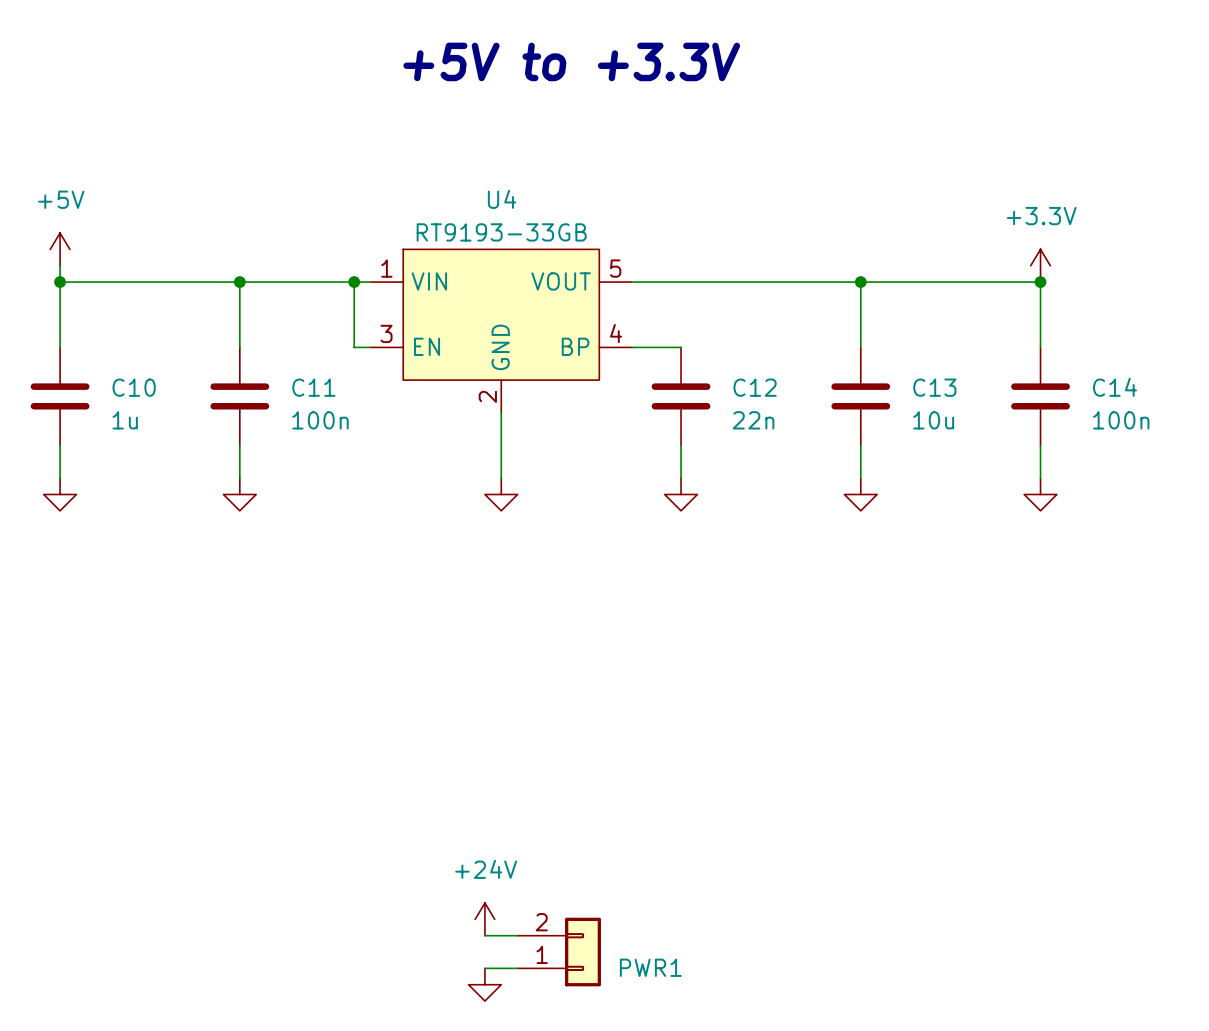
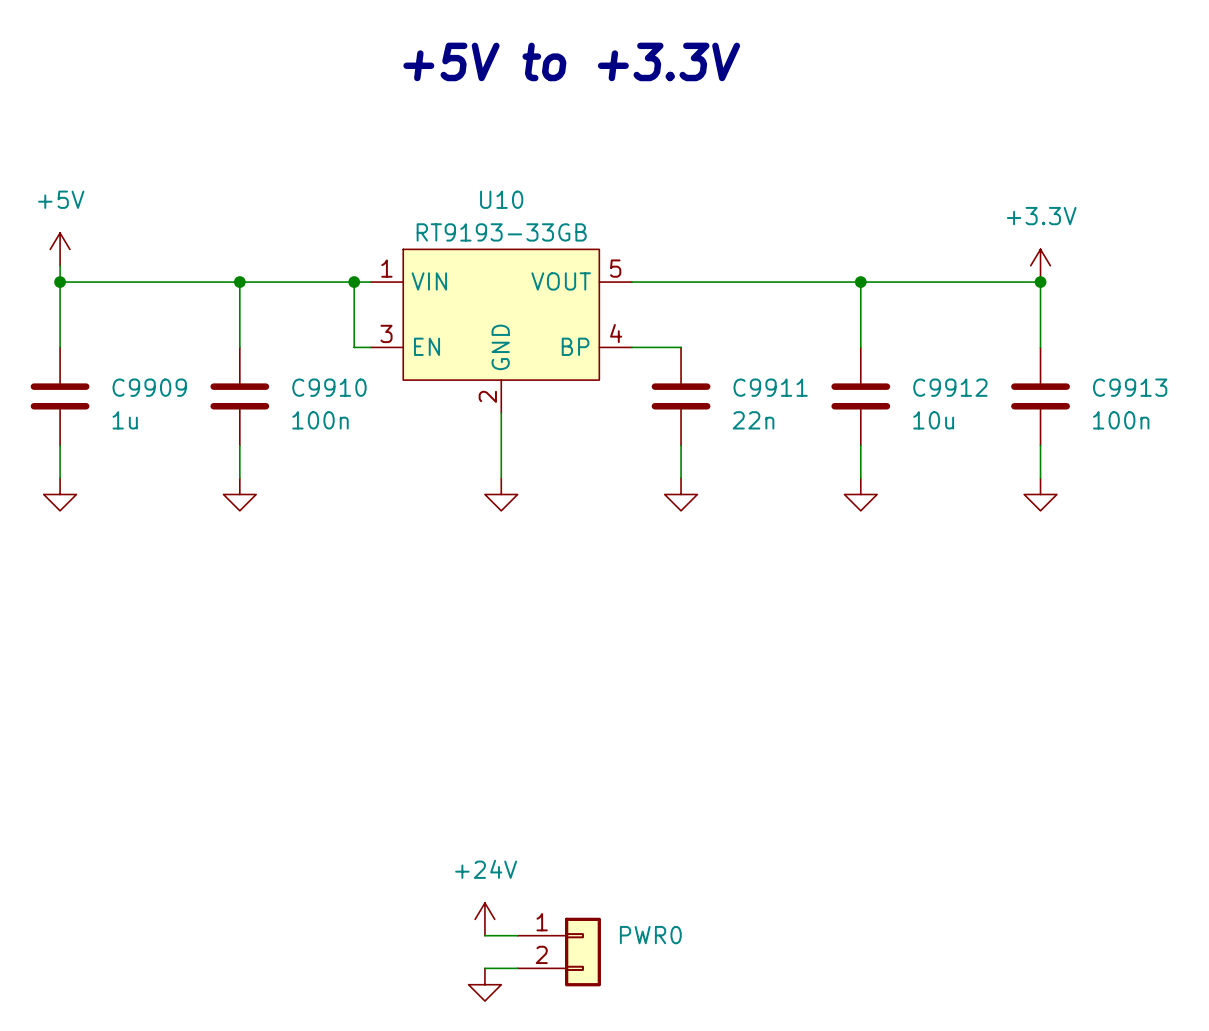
U4 name: U4 (502, 199) -> U10 (501, 199)
C10 name: C10 (134, 387) -> C9909 (149, 387)
C11 name: C11 (313, 387) -> C9910 (329, 387)
C12 name: C12 (755, 387) -> C9911 (770, 387)
C13 name: C13 (934, 387) -> C9912 (950, 387)
C14 name: C14 (1114, 387) -> C9913 (1130, 387)
PWR1 flip: as is (582, 952) -> up-down (582, 952)
PWR1 name: PWR1 (650, 967) -> PWR0 (650, 935)

